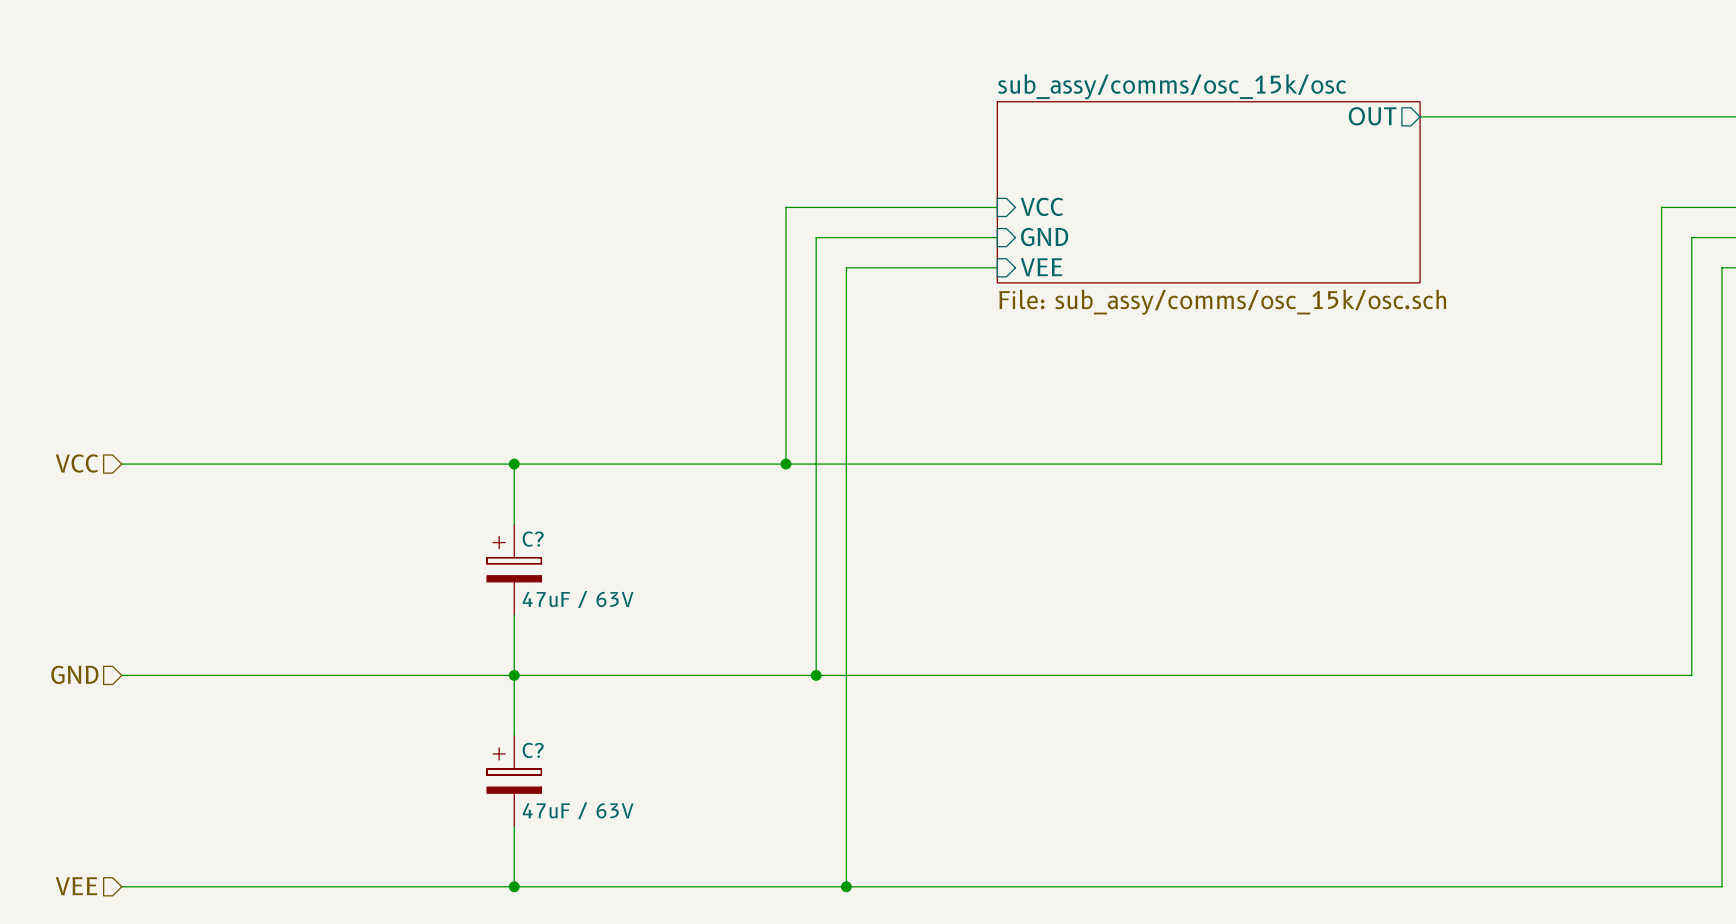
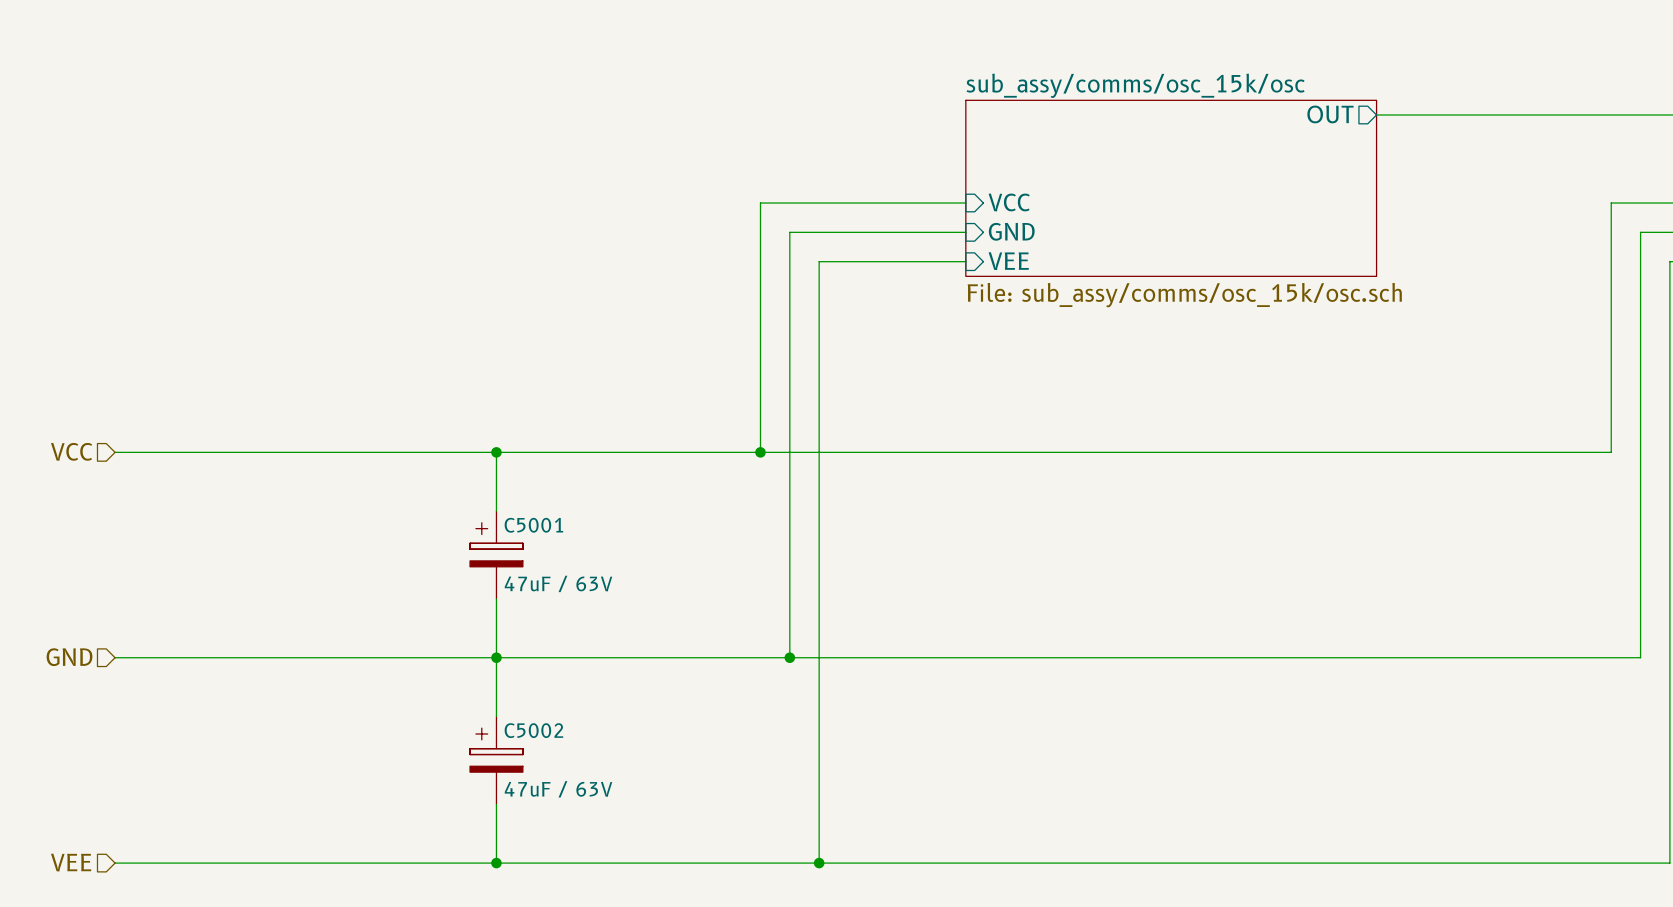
C? name: C? (533, 539) -> C5001 (533, 525)
C? name: C? (533, 750) -> C5002 (533, 730)

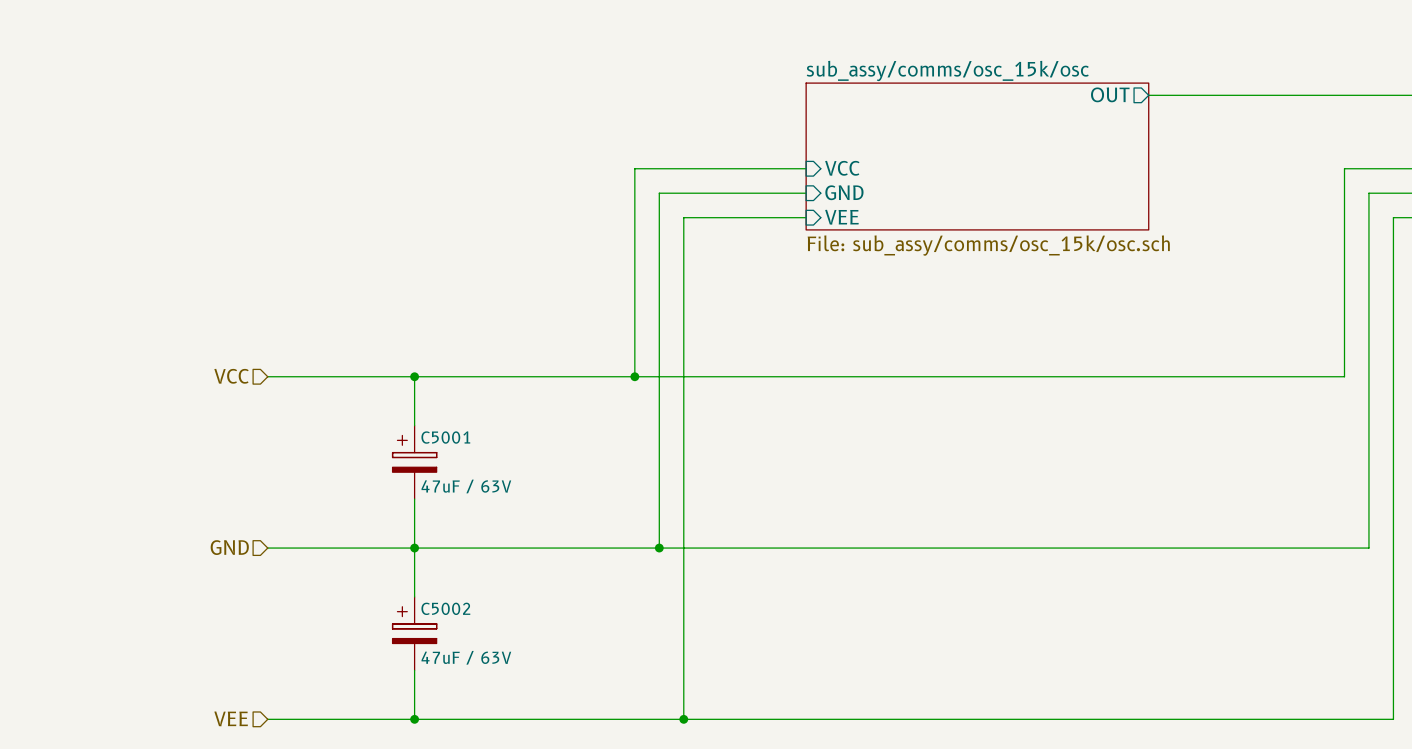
hierarchical label position: VCC (71, 451) -> VCC (231, 376)
wire: (115, 452) (320, 452) -> none
hierarchical label position: GND (69, 657) -> GND (229, 547)
wire: (115, 657) (320, 657) -> none
hierarchical label position: VEE (71, 862) -> VEE (231, 718)
wire: (115, 863) (320, 863) -> none

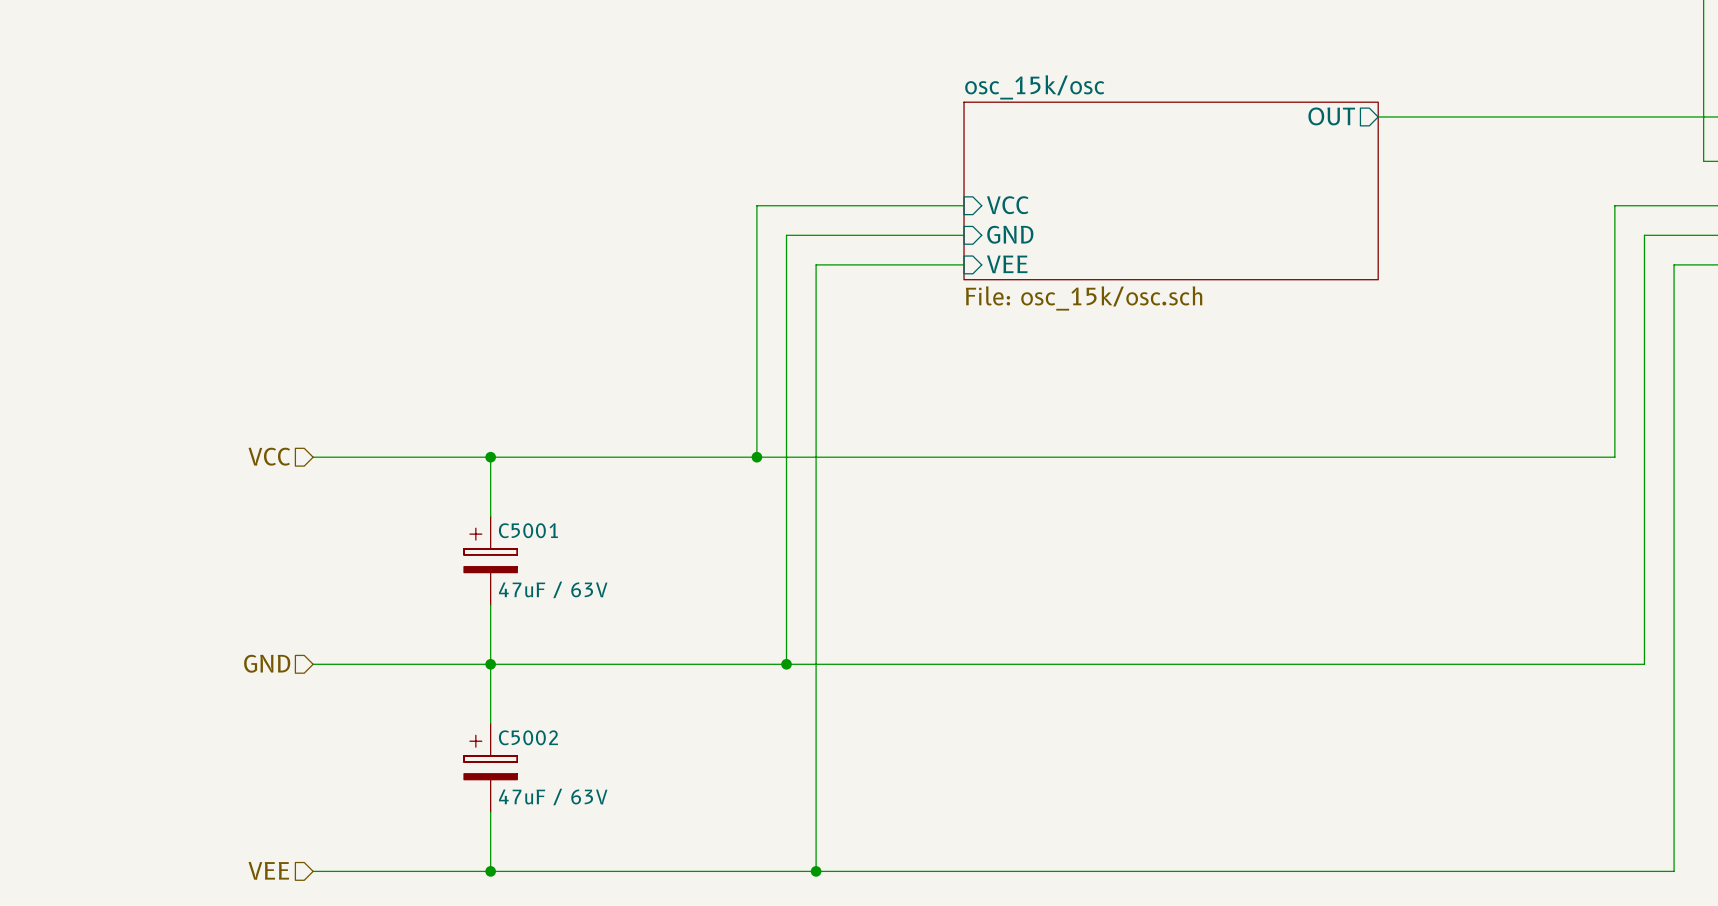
sheet sub_assy/comms/osc_15k/osc name: sub_assy/comms/osc_15k/osc (947, 70) -> osc_15k/osc (1034, 87)
sheet sub_assy/comms/osc_15k/osc value: File: sub_assy/comms/osc_15k/osc.sch (988, 245) -> File: osc_15k/osc.sch (1084, 298)

